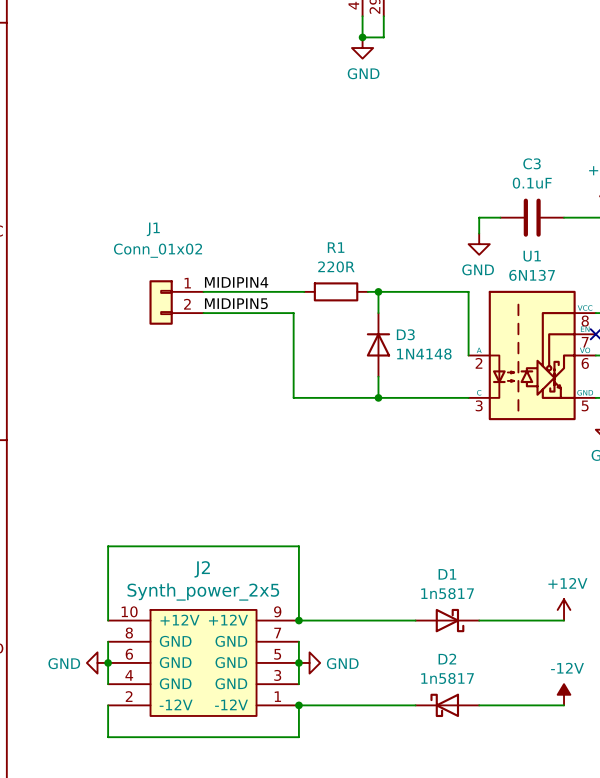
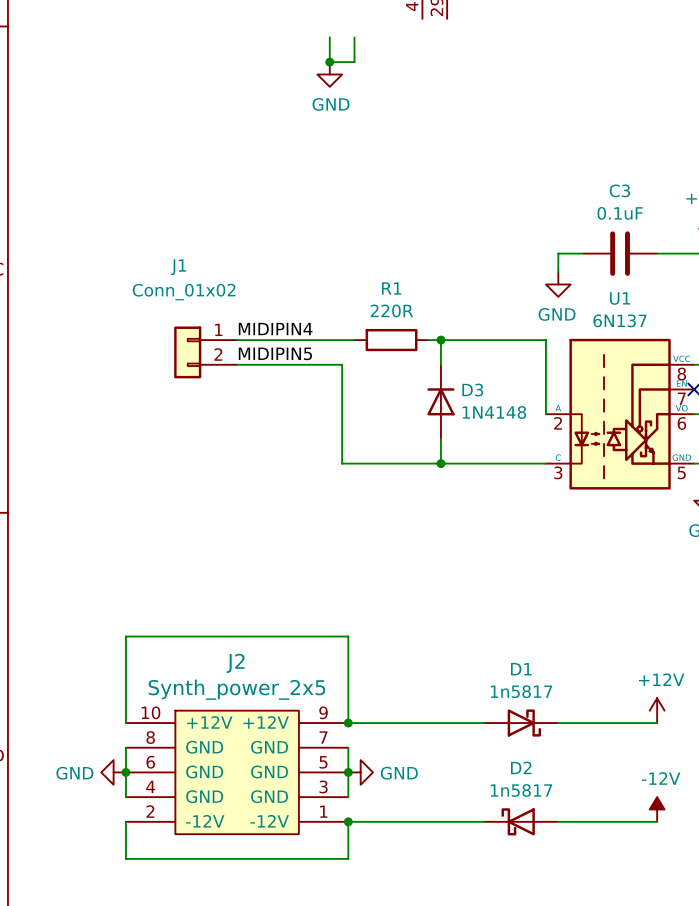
wire: (362, 16) (362, 37) (383, 37) (383, 16) -> (329, 37) (329, 62) (354, 62) (354, 37)
junction: (362, 37) -> none
power symbol position: GND (362, 48) -> GND (329, 74)
junction: none -> (329, 62)

